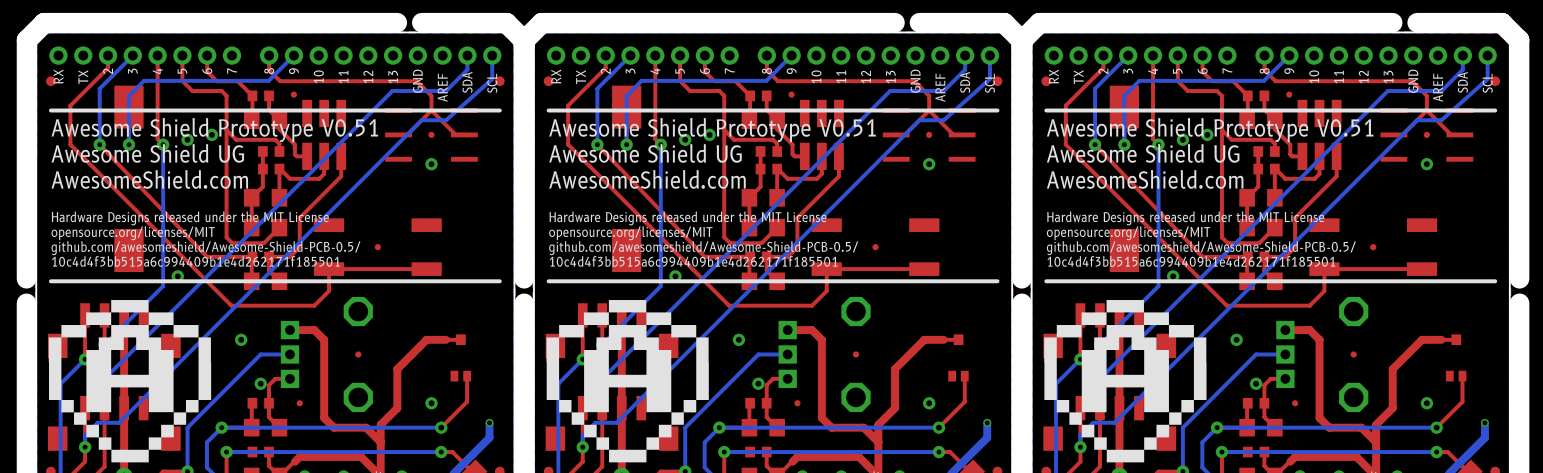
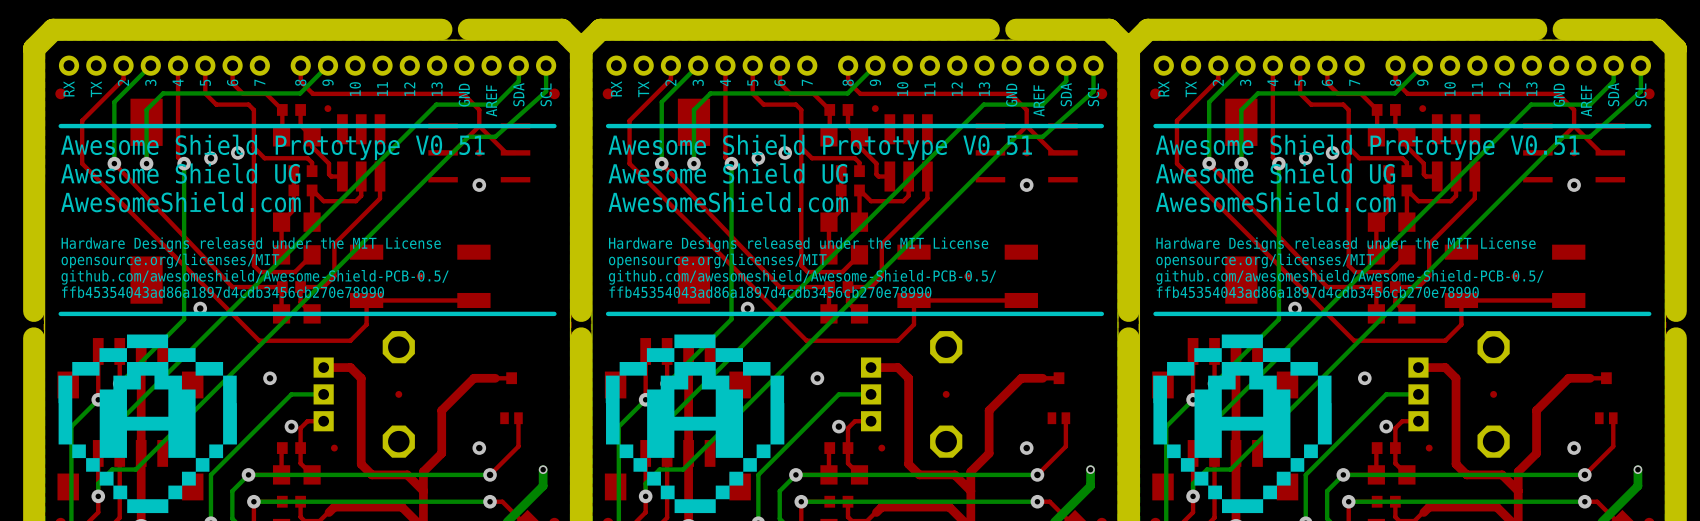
text: 10c4d4f3bb515a6c994409b1e4d262171f185501 (195, 261) -> ffb45354043ad86a1897d4cdb3456cb270e78990 (223, 292)
text: 10c4d4f3bb515a6c994409b1e4d262171f185501 (693, 261) -> ffb45354043ad86a1897d4cdb3456cb270e78990 (770, 292)
text: 10c4d4f3bb515a6c994409b1e4d262171f185501 (1191, 261) -> ffb45354043ad86a1897d4cdb3456cb270e78990 (1317, 292)

